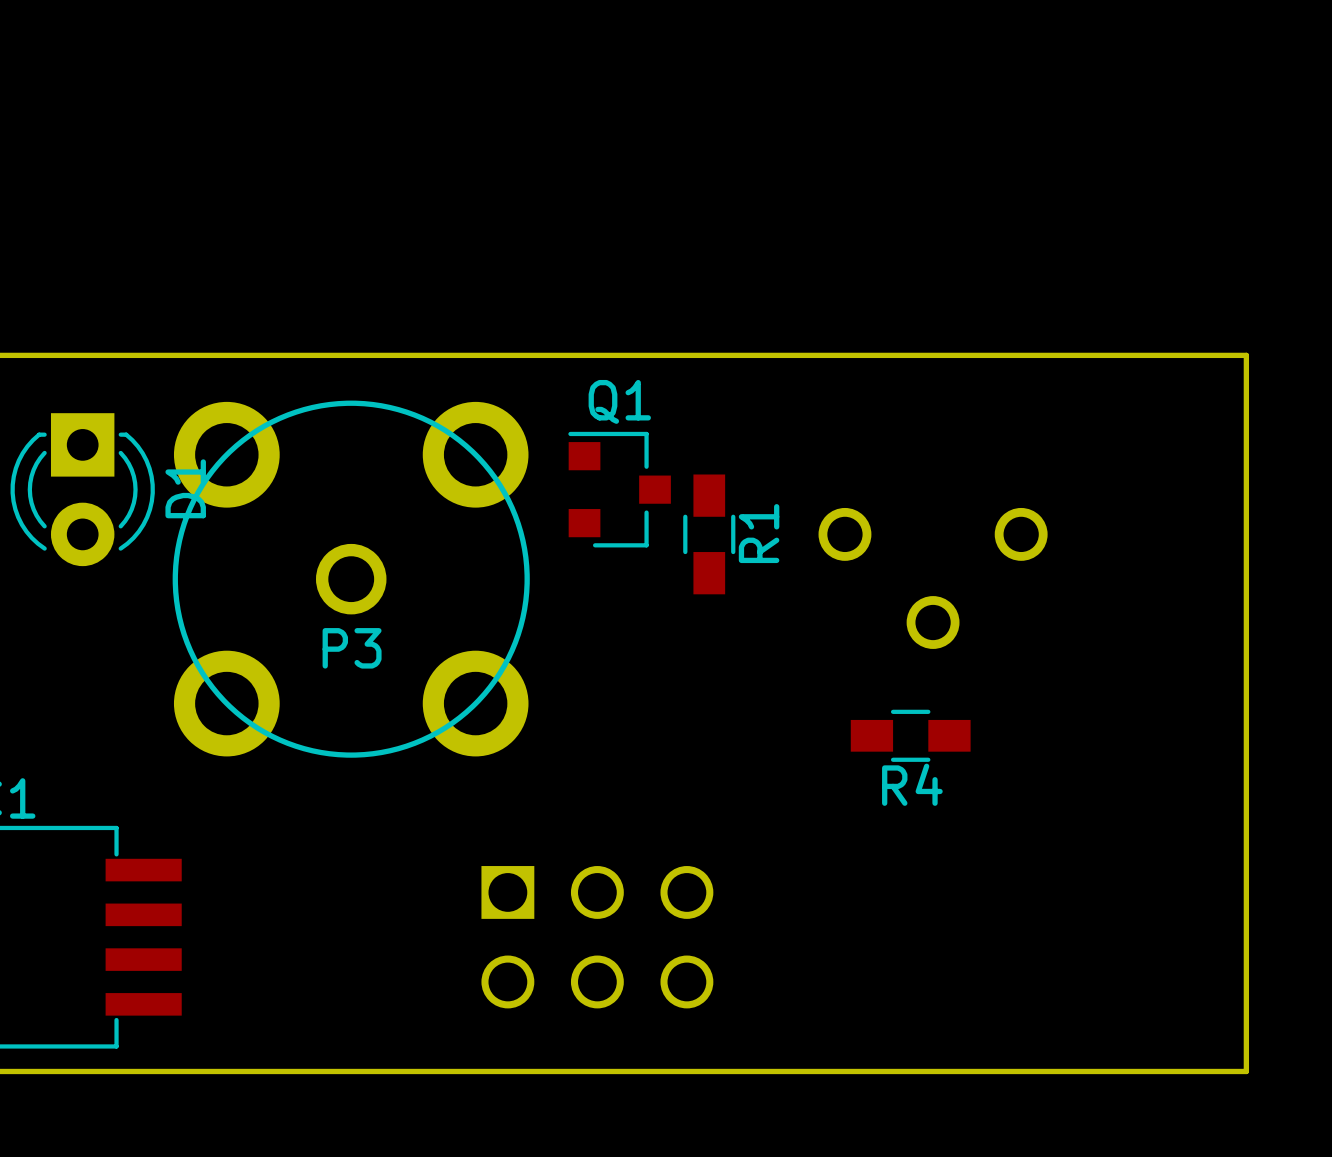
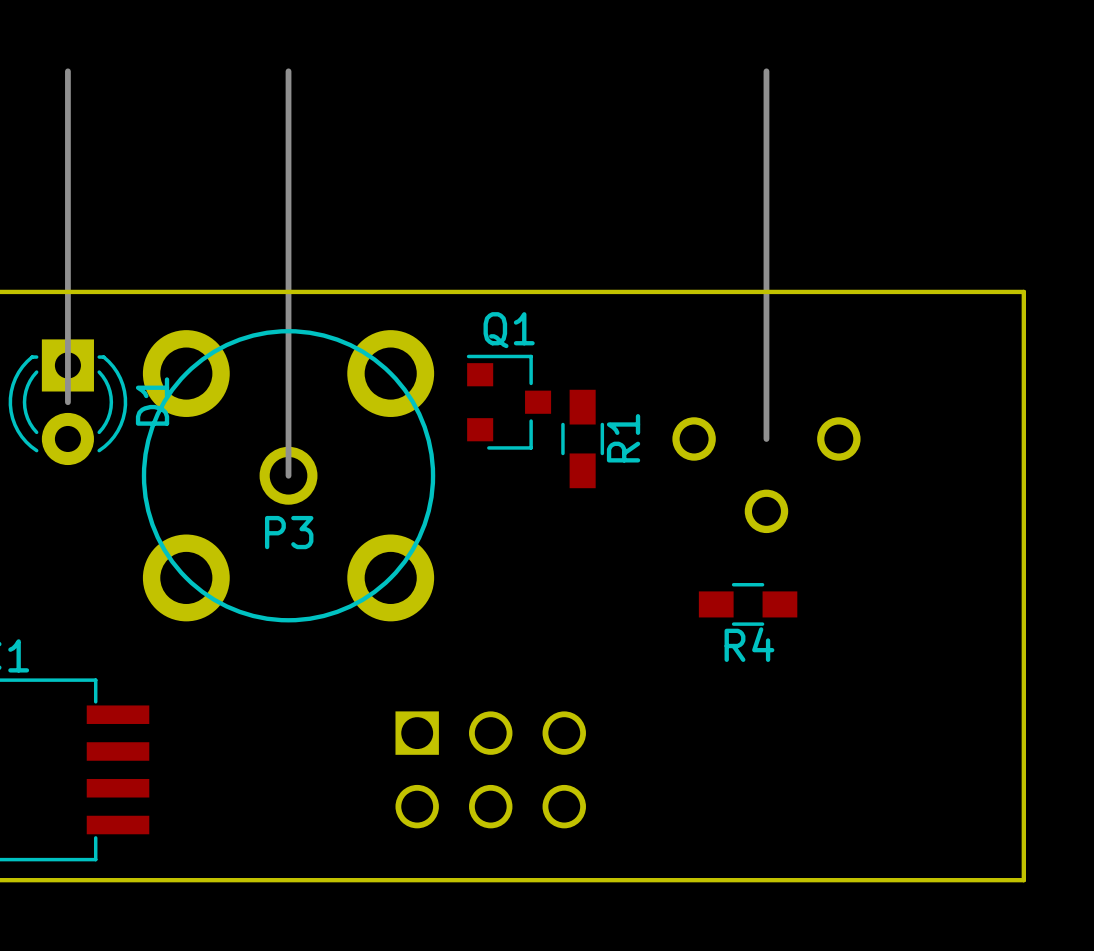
line: none -> (67, 71) (67, 402)
line: none -> (288, 71) (288, 475)
line: none -> (766, 71) (766, 438)

